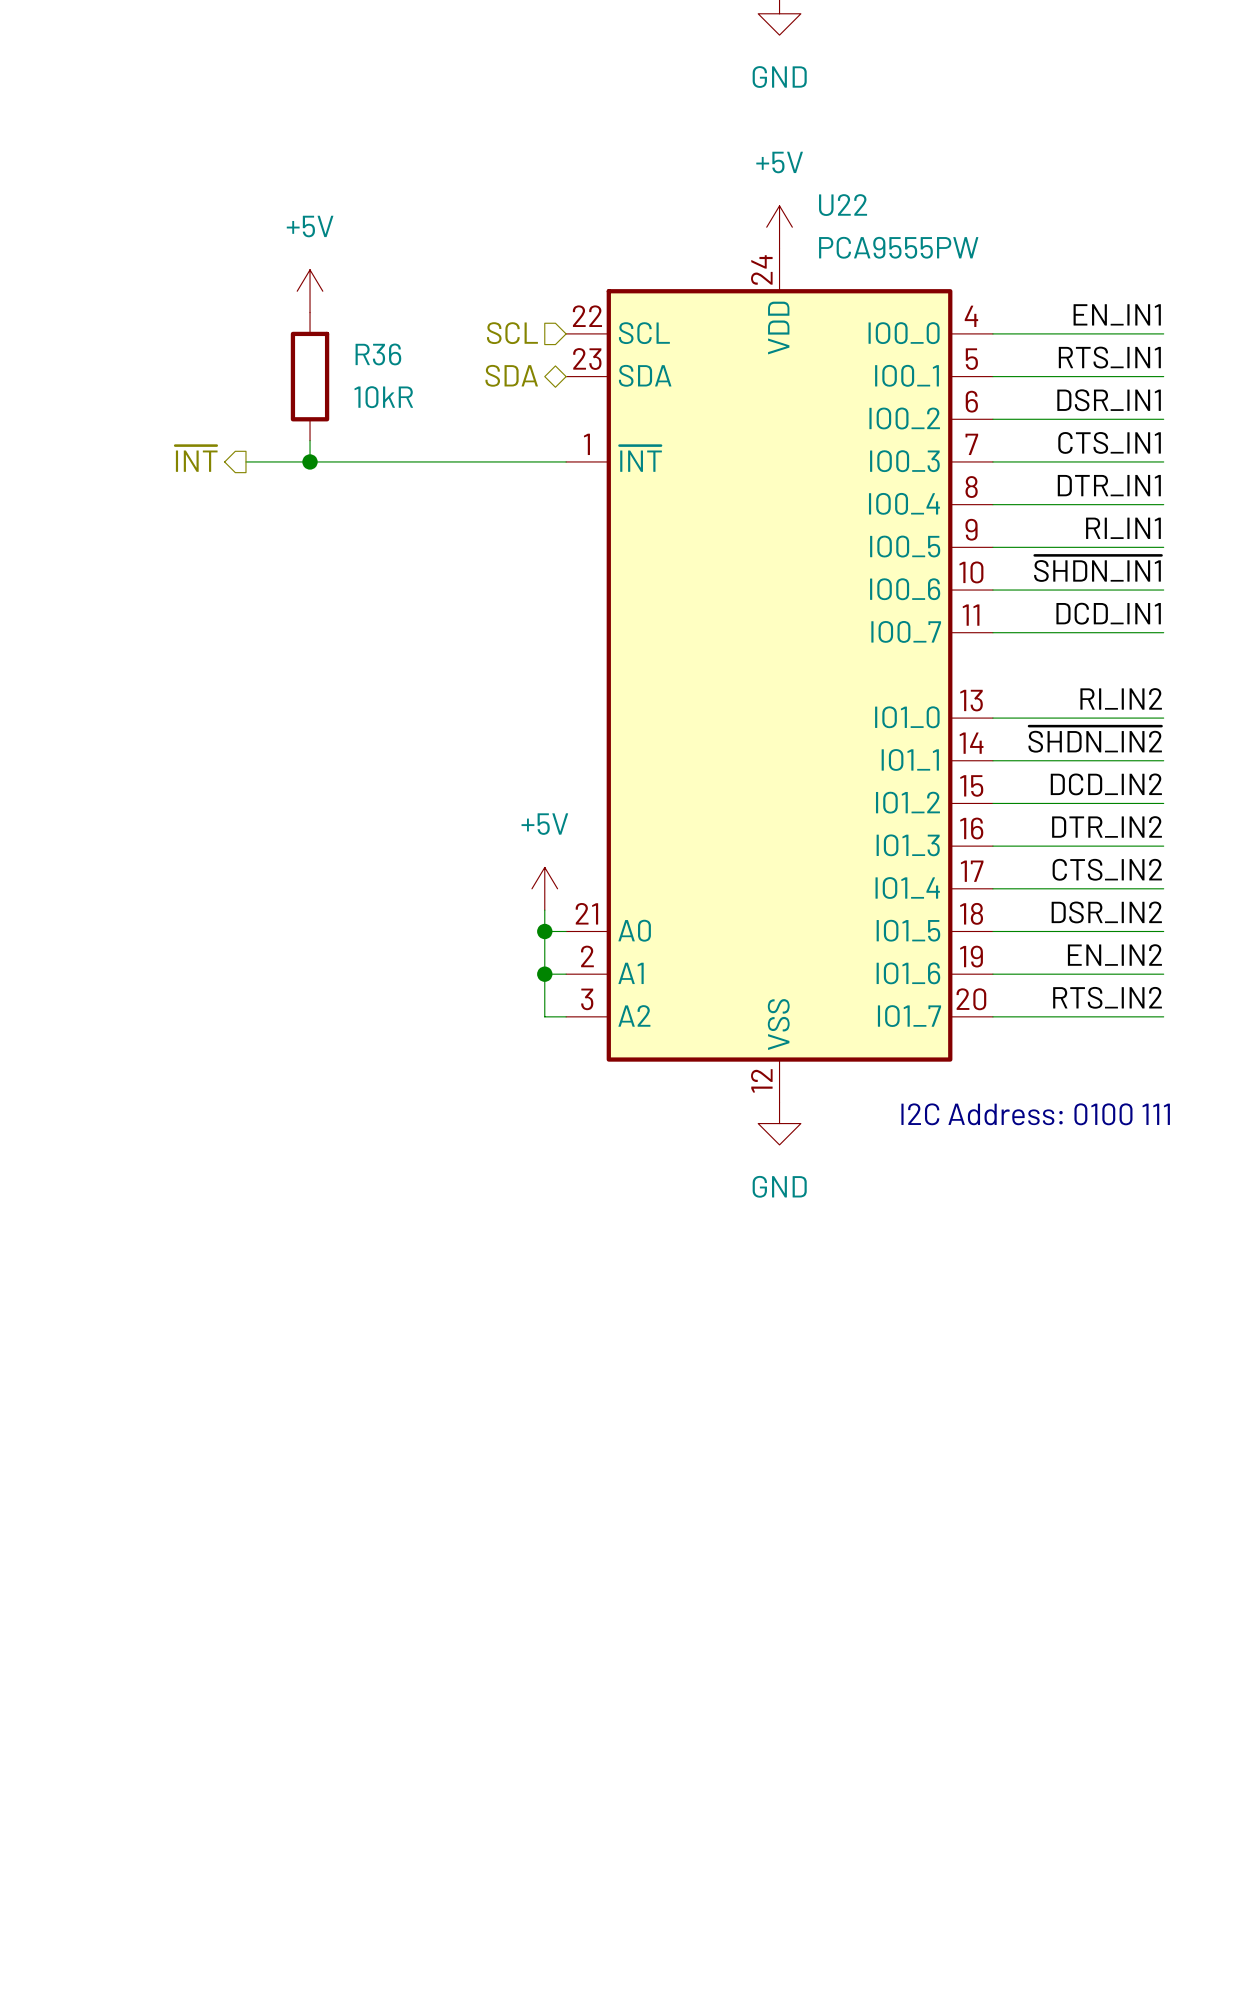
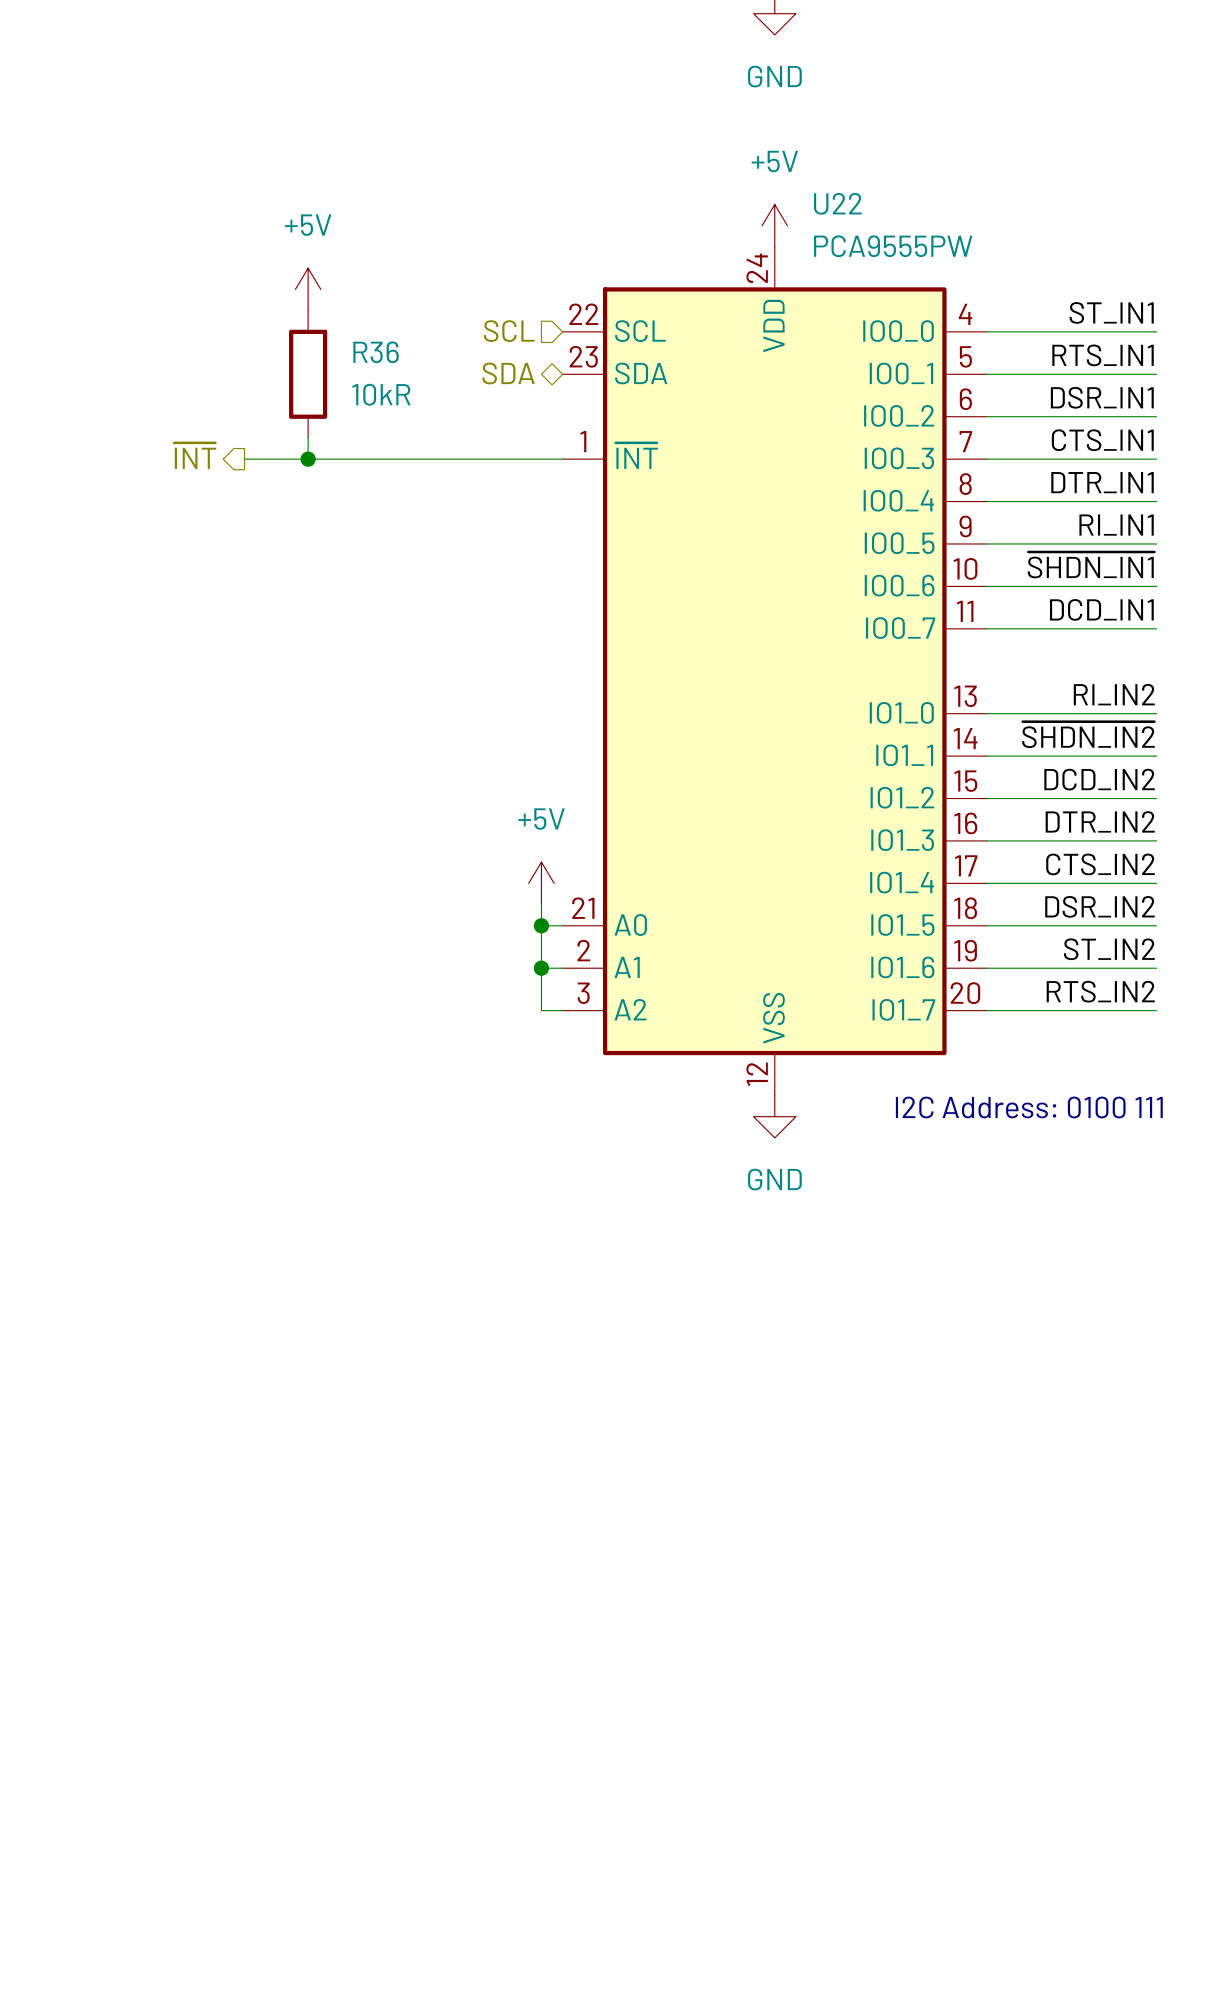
label: EN_IN1 (1117, 314) -> ST_IN1 (1111, 312)
label: EN_IN2 (1114, 955) -> ST_IN2 (1109, 949)

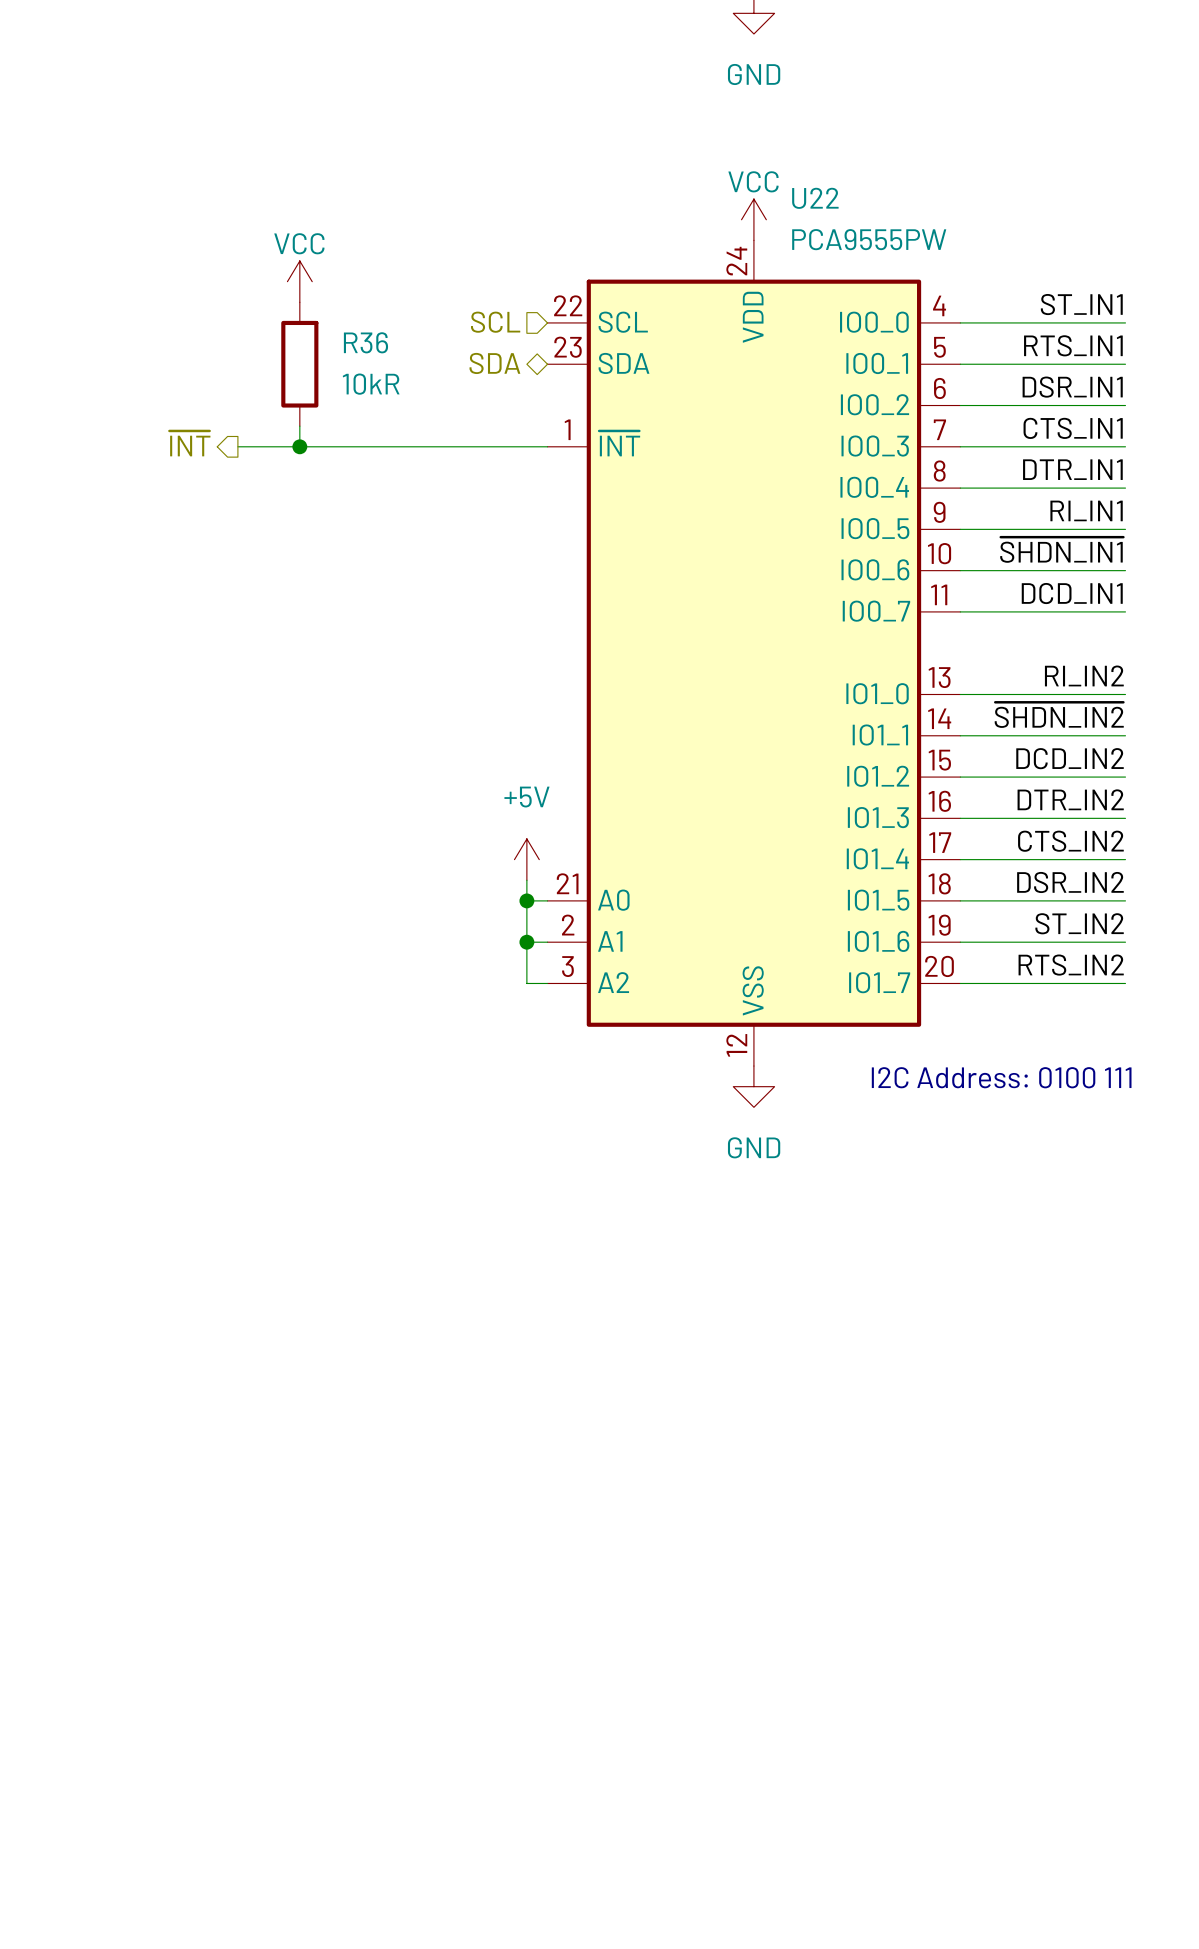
power symbol: +5V (774, 225) -> VCC (753, 219)
power symbol: +5V (308, 289) -> VCC (299, 281)

